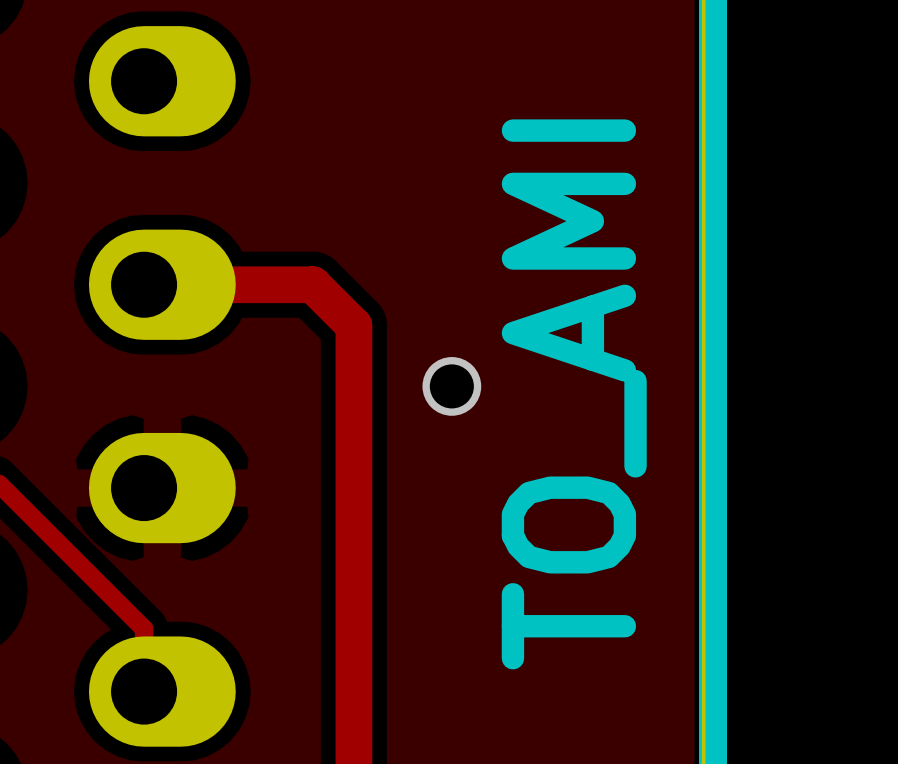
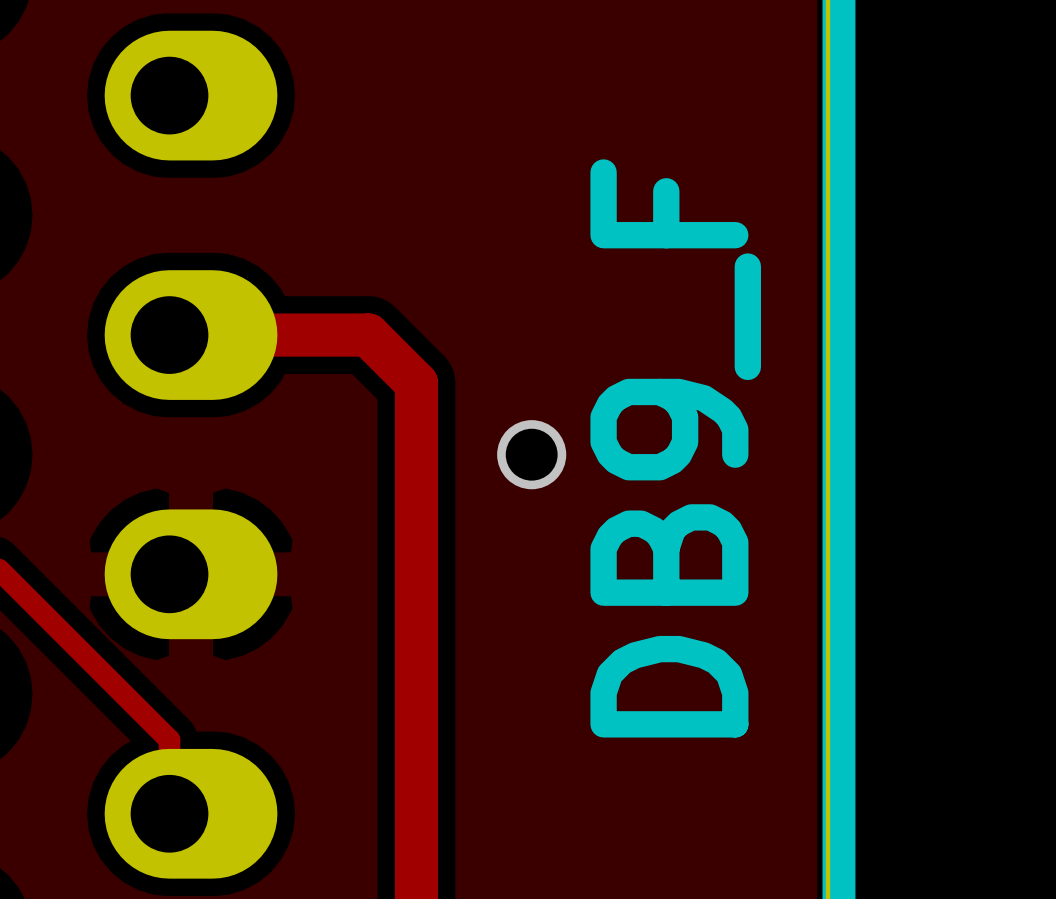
part value: TO_AMI (574, 394) -> DB9_F (675, 448)

